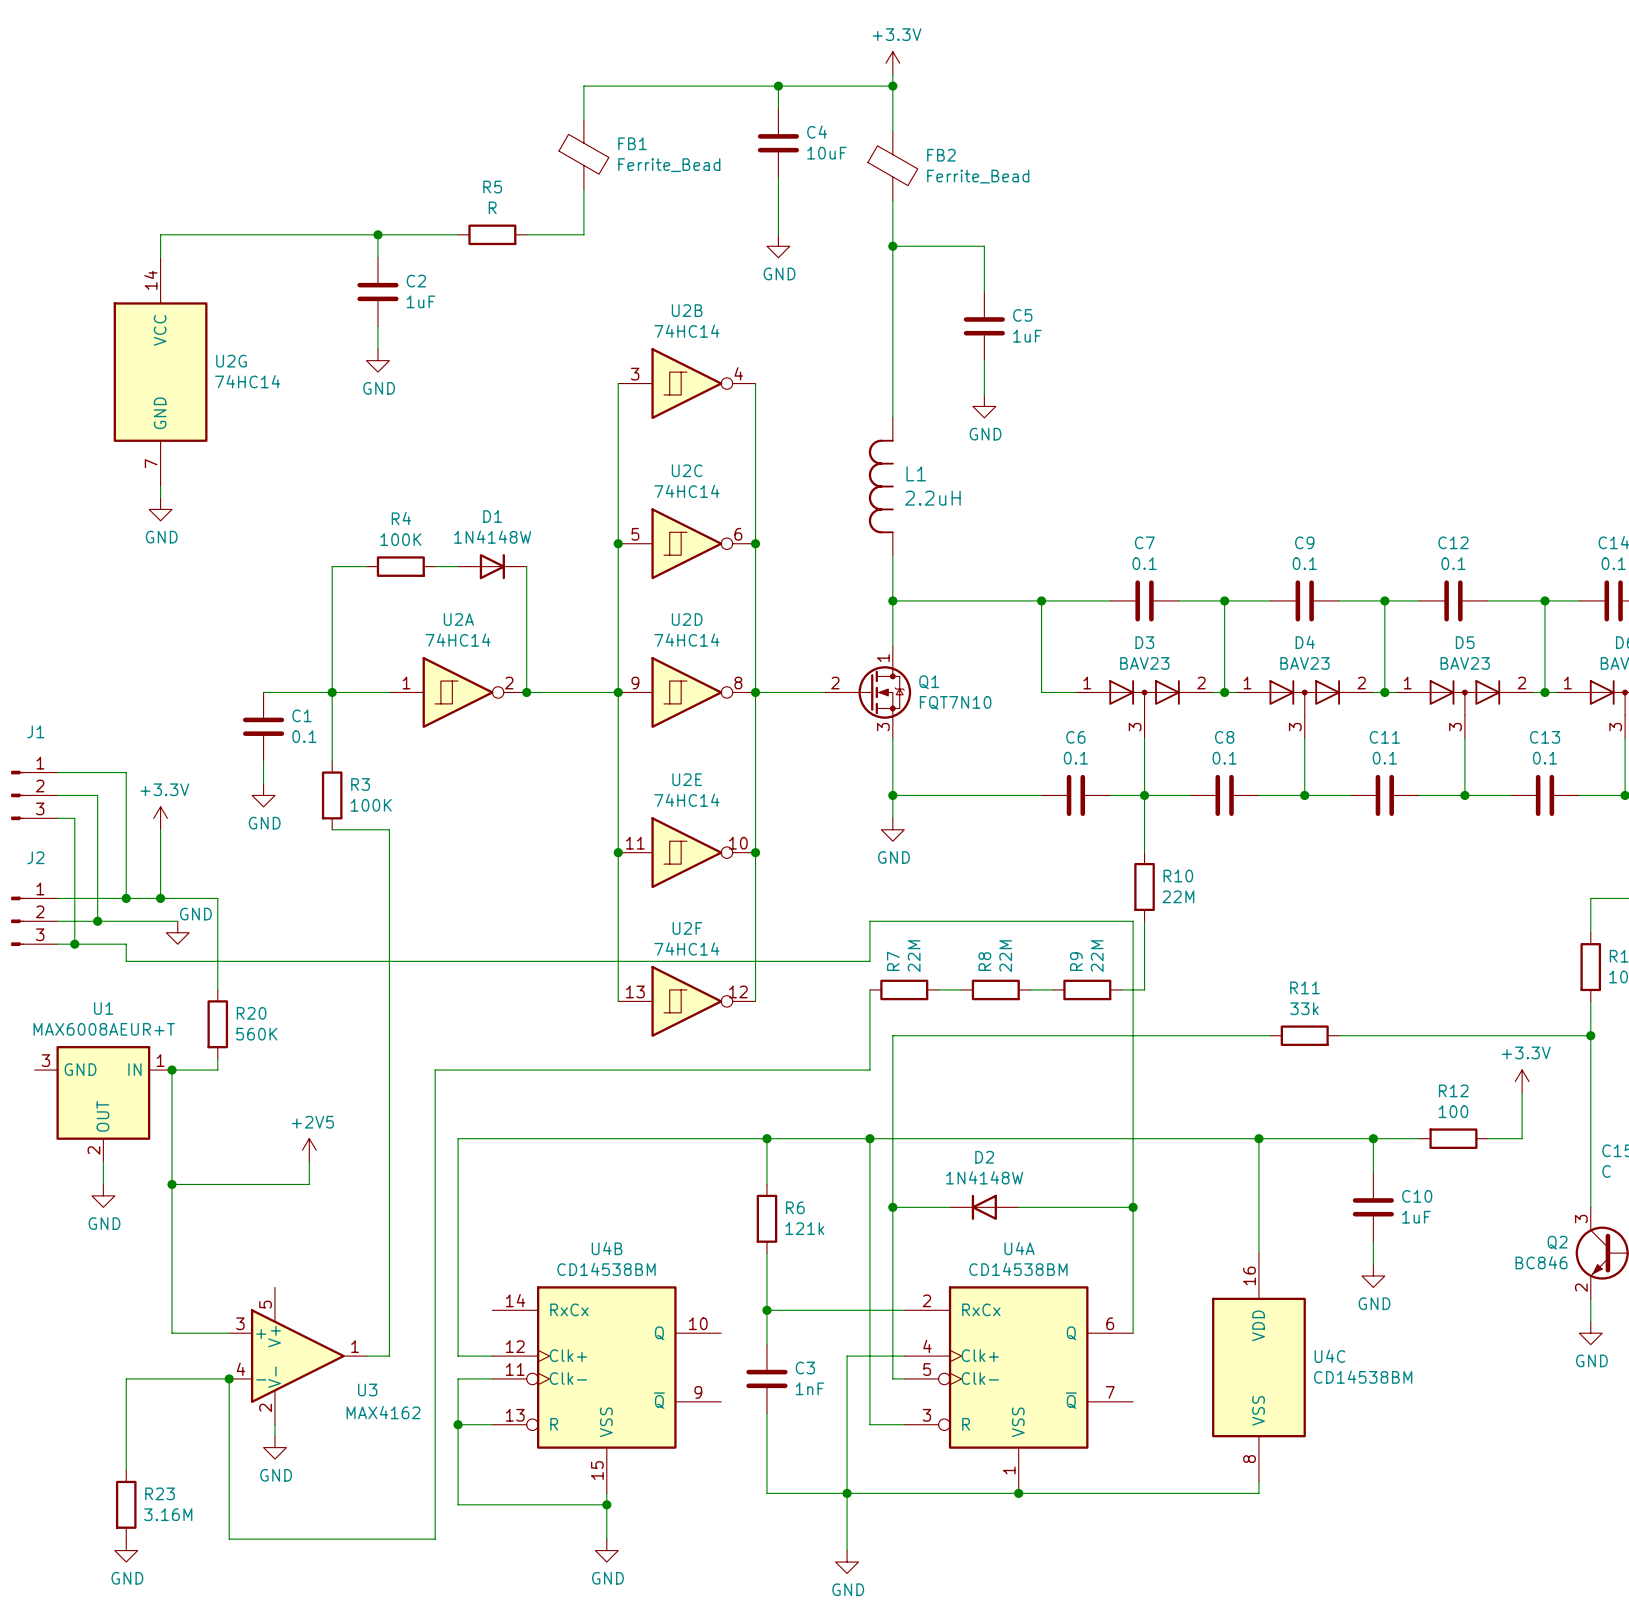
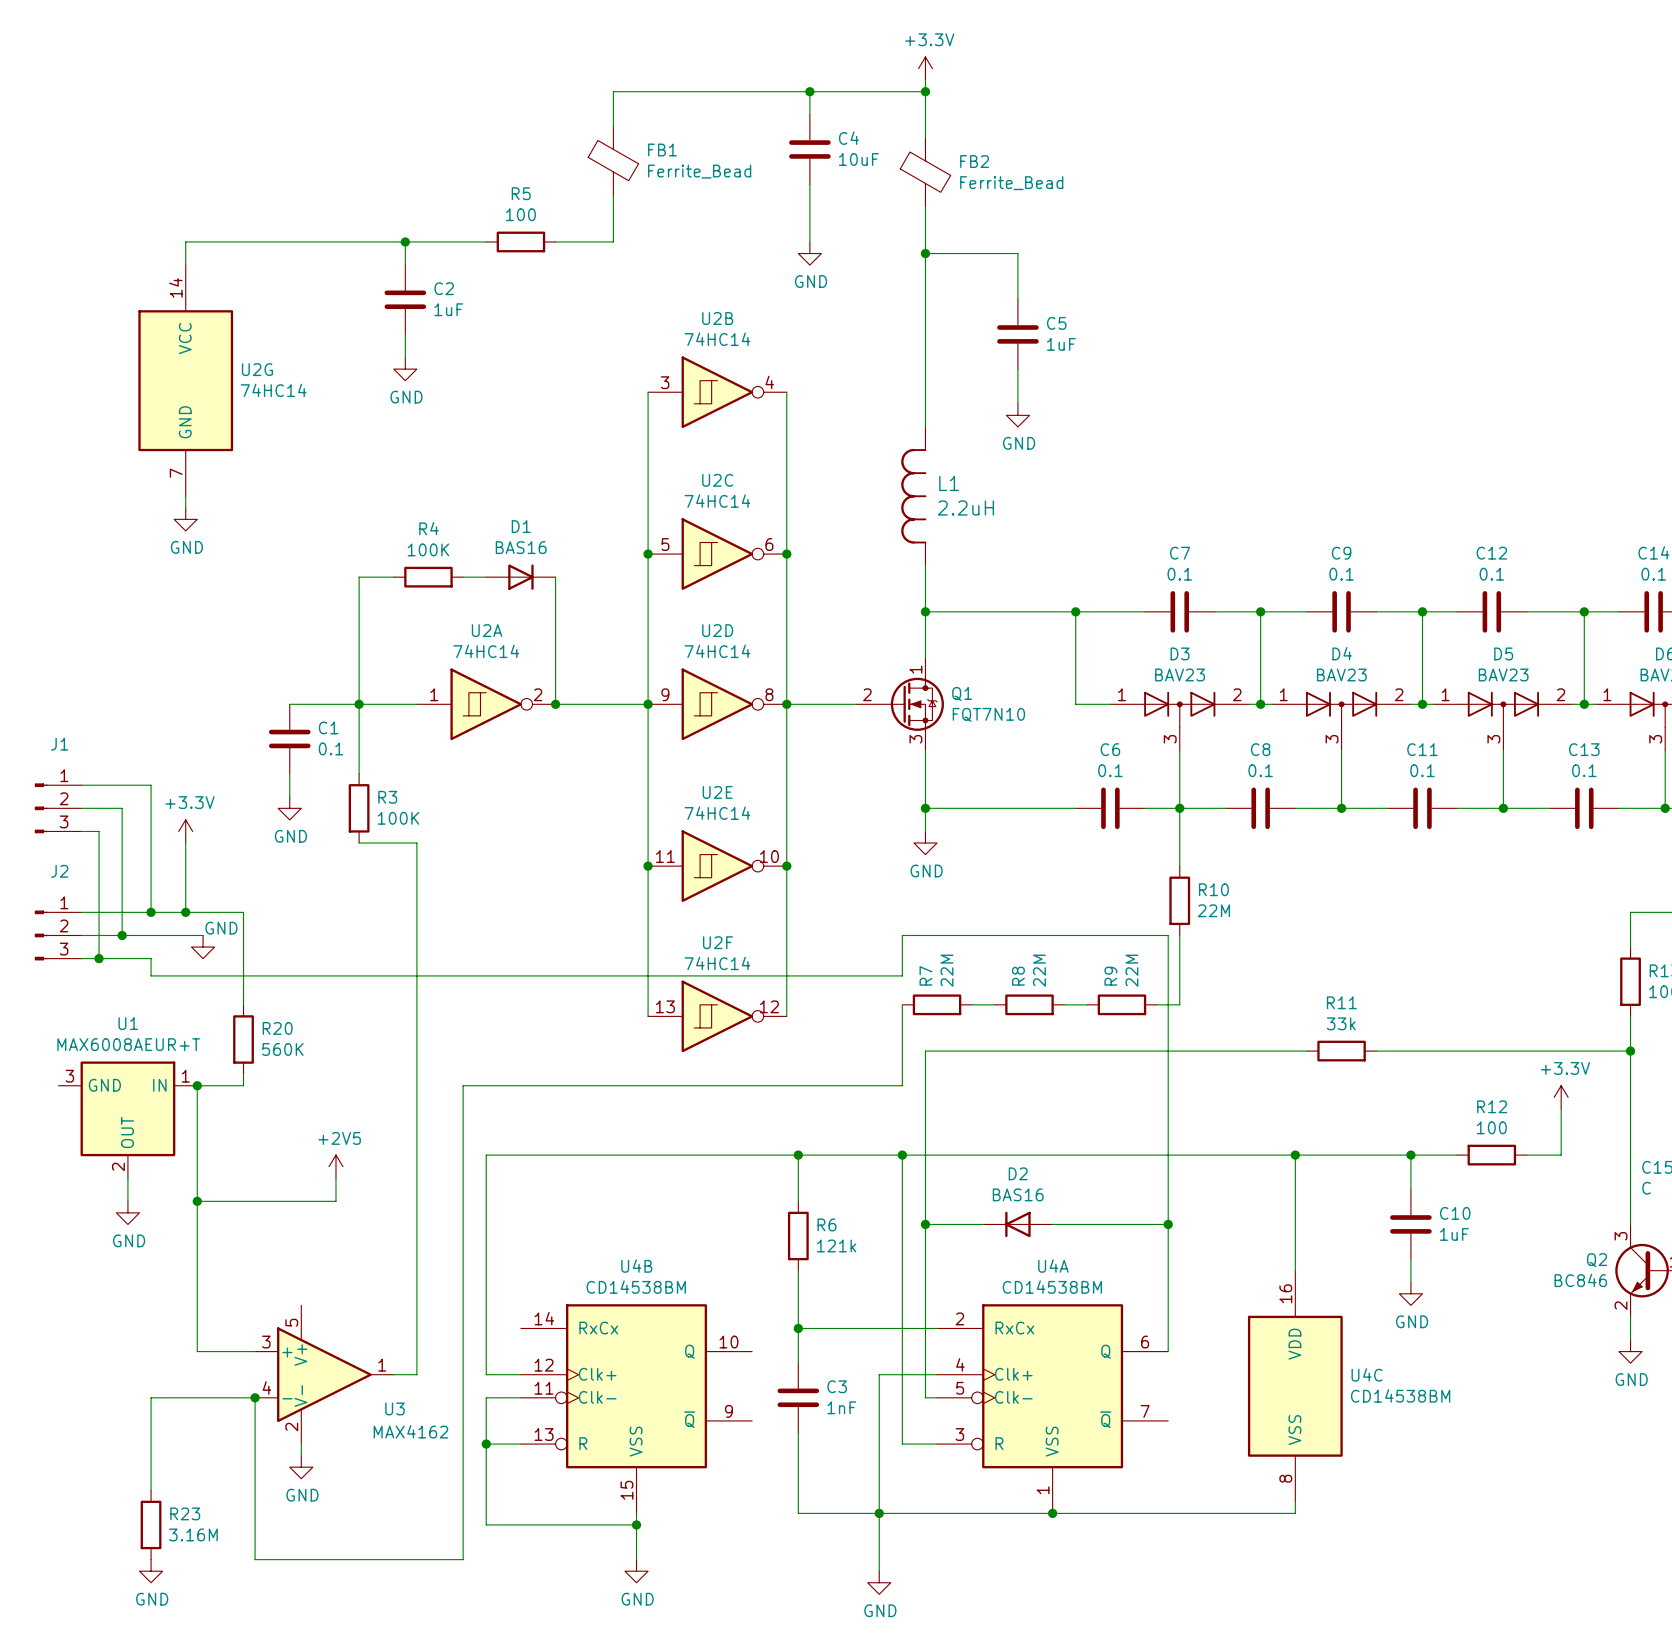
R5 value: R (492, 207) -> 100 (520, 214)
D1 value: 1N4148W (492, 537) -> BAS16 (521, 547)
D2 value: 1N4148W (984, 1177) -> BAS16 (1018, 1194)

